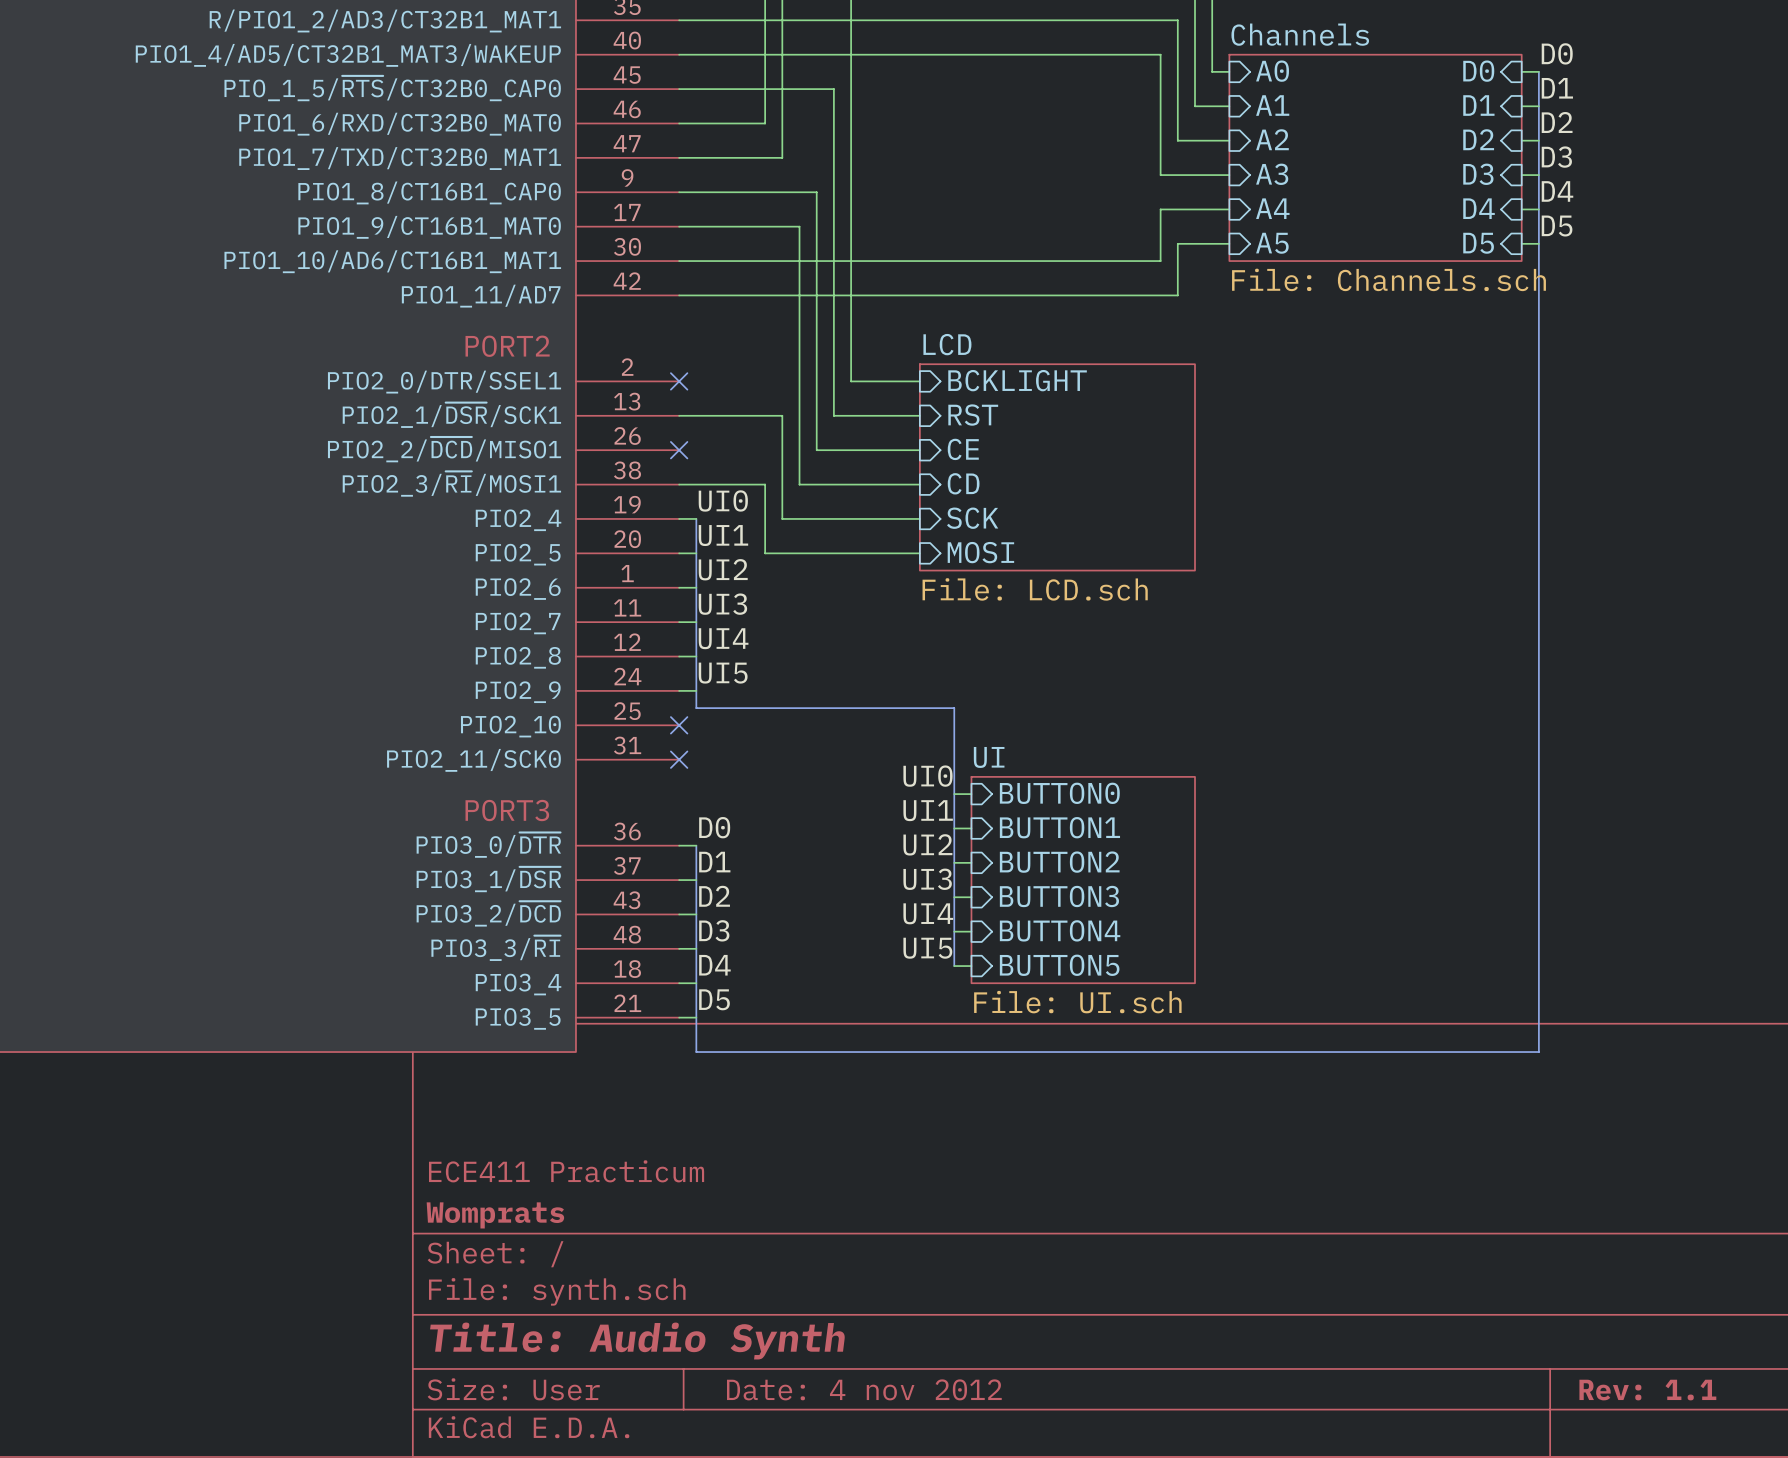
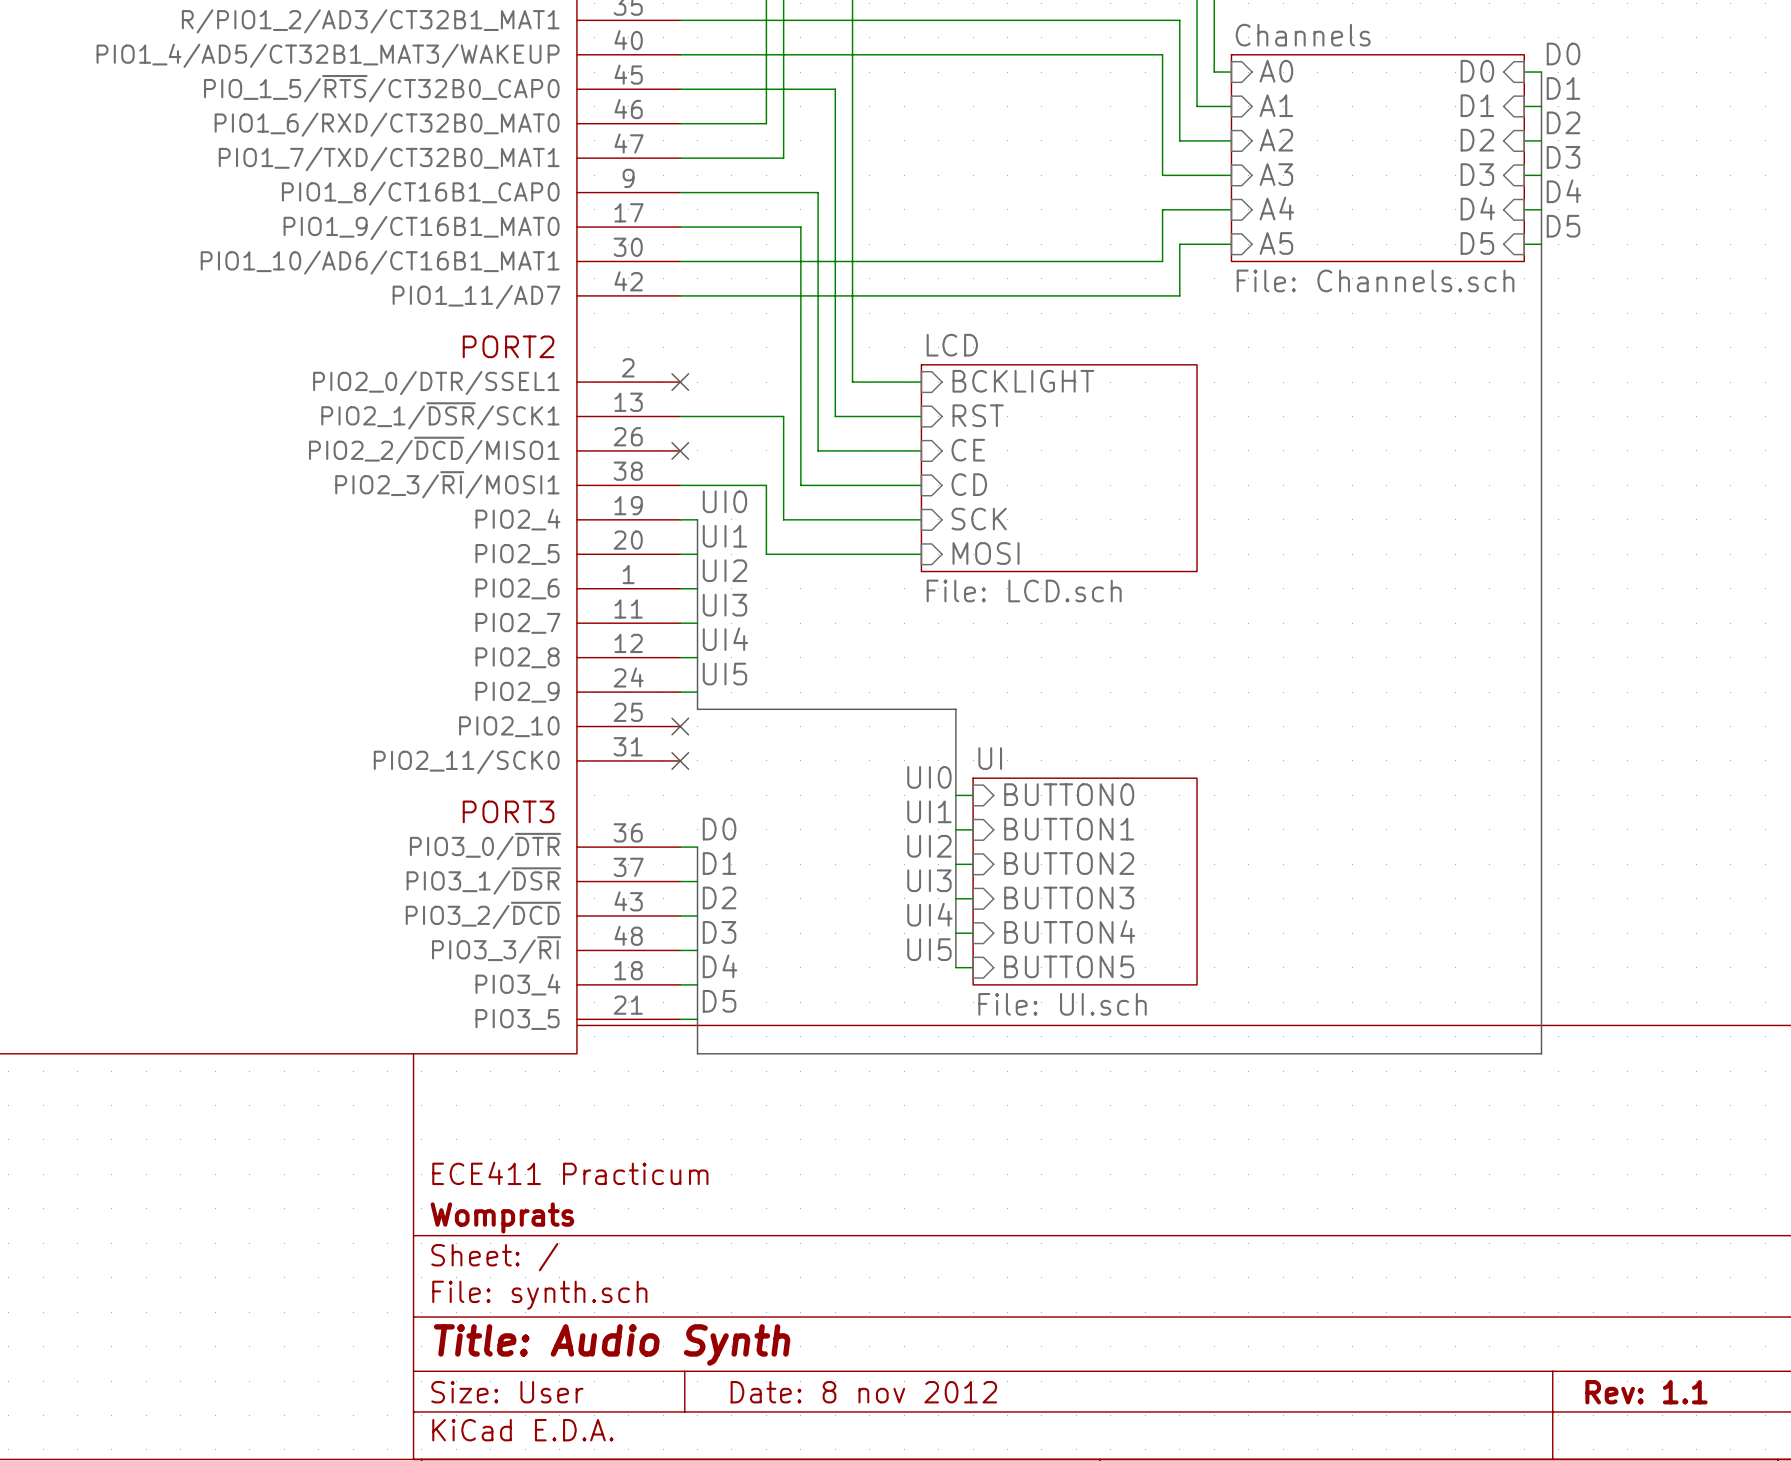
title block: Date: 4 nov 2012 (864, 1389) -> Date: 8 nov 2012 (863, 1392)

